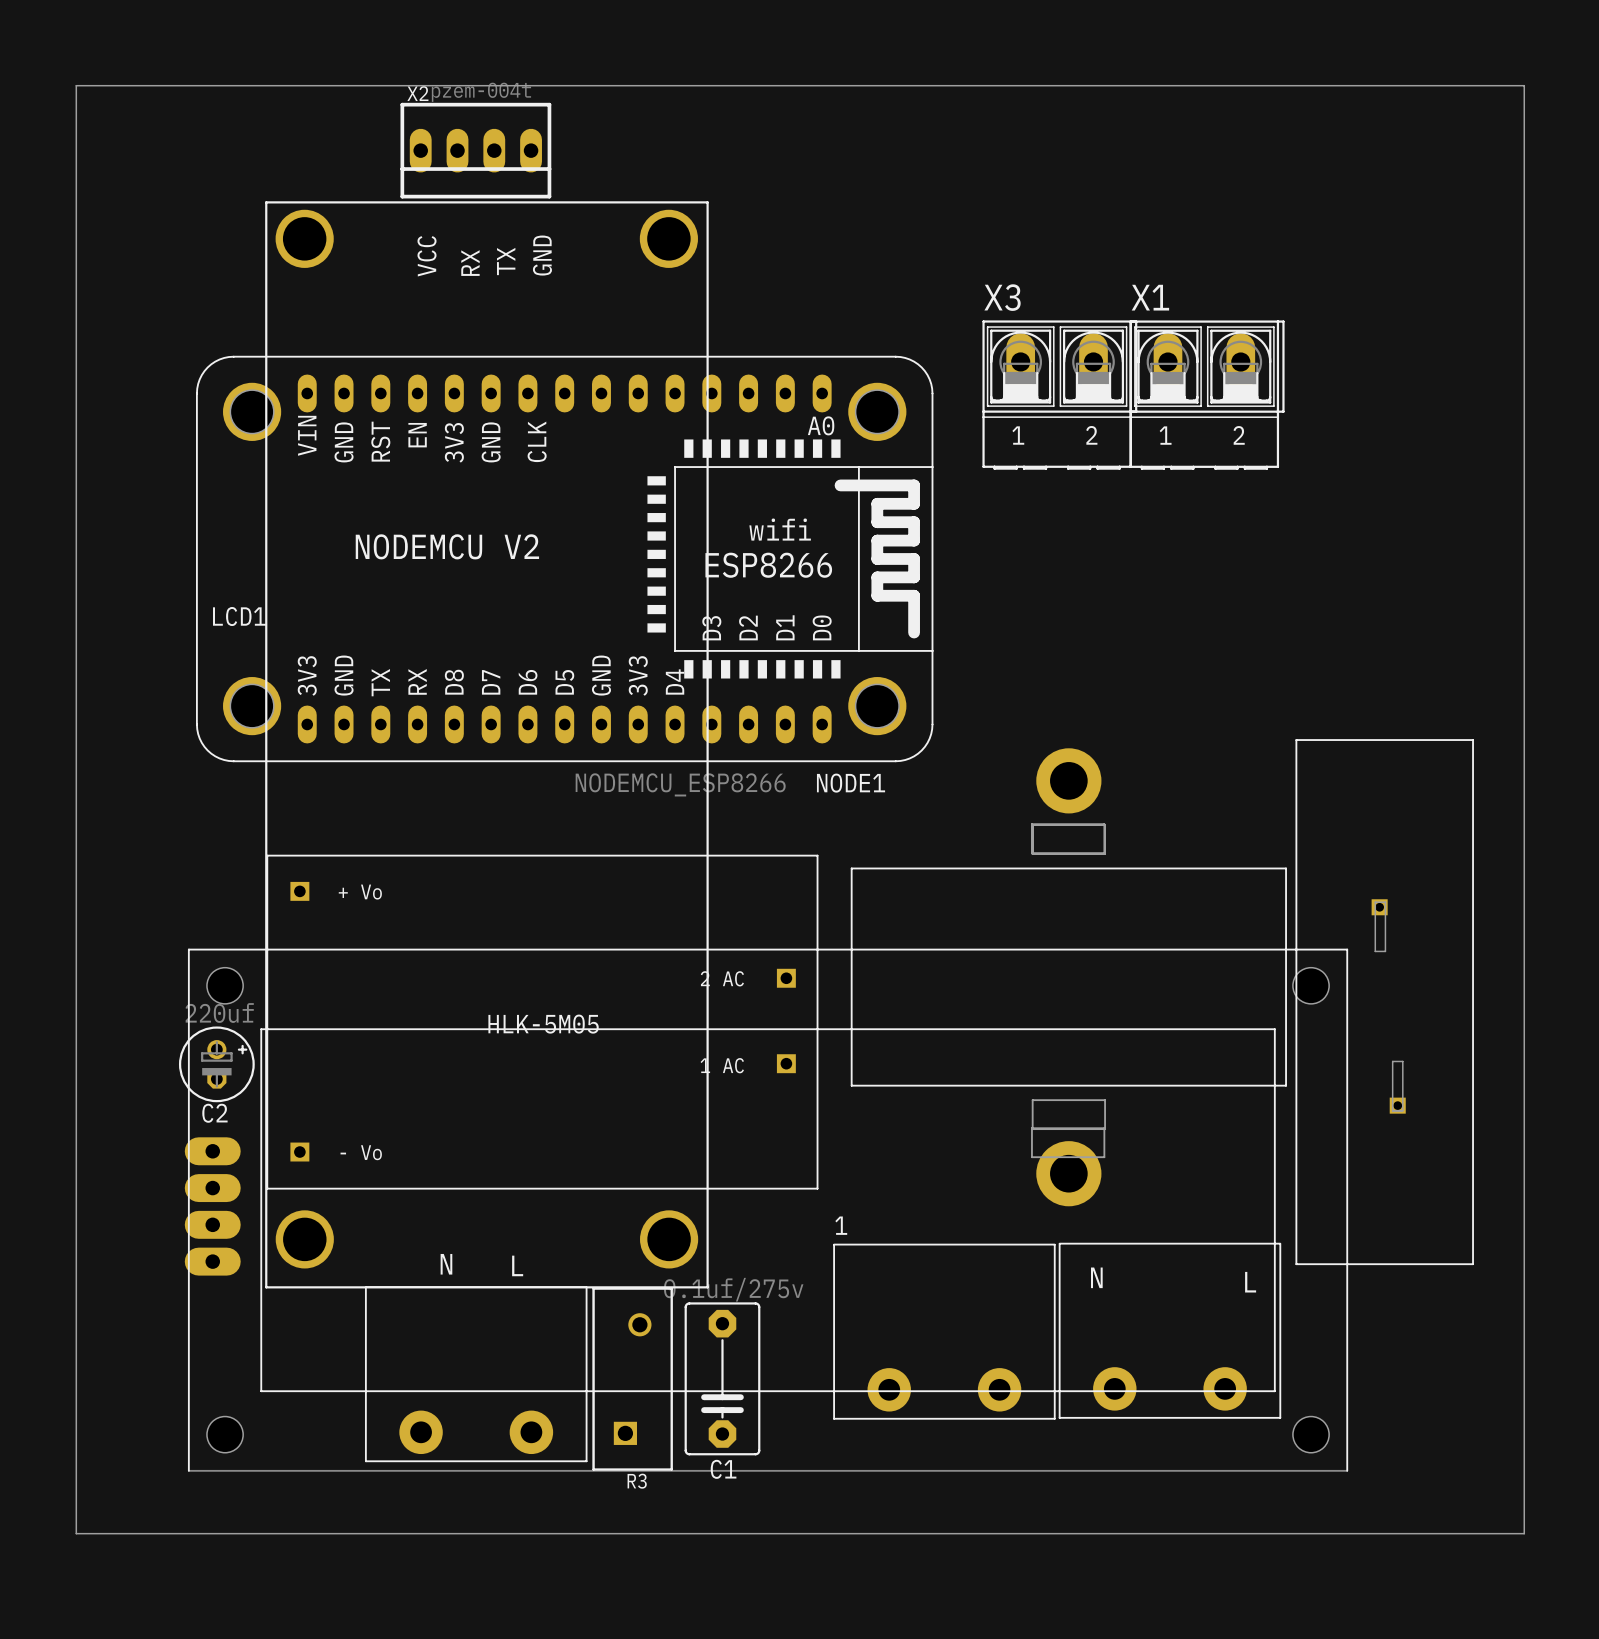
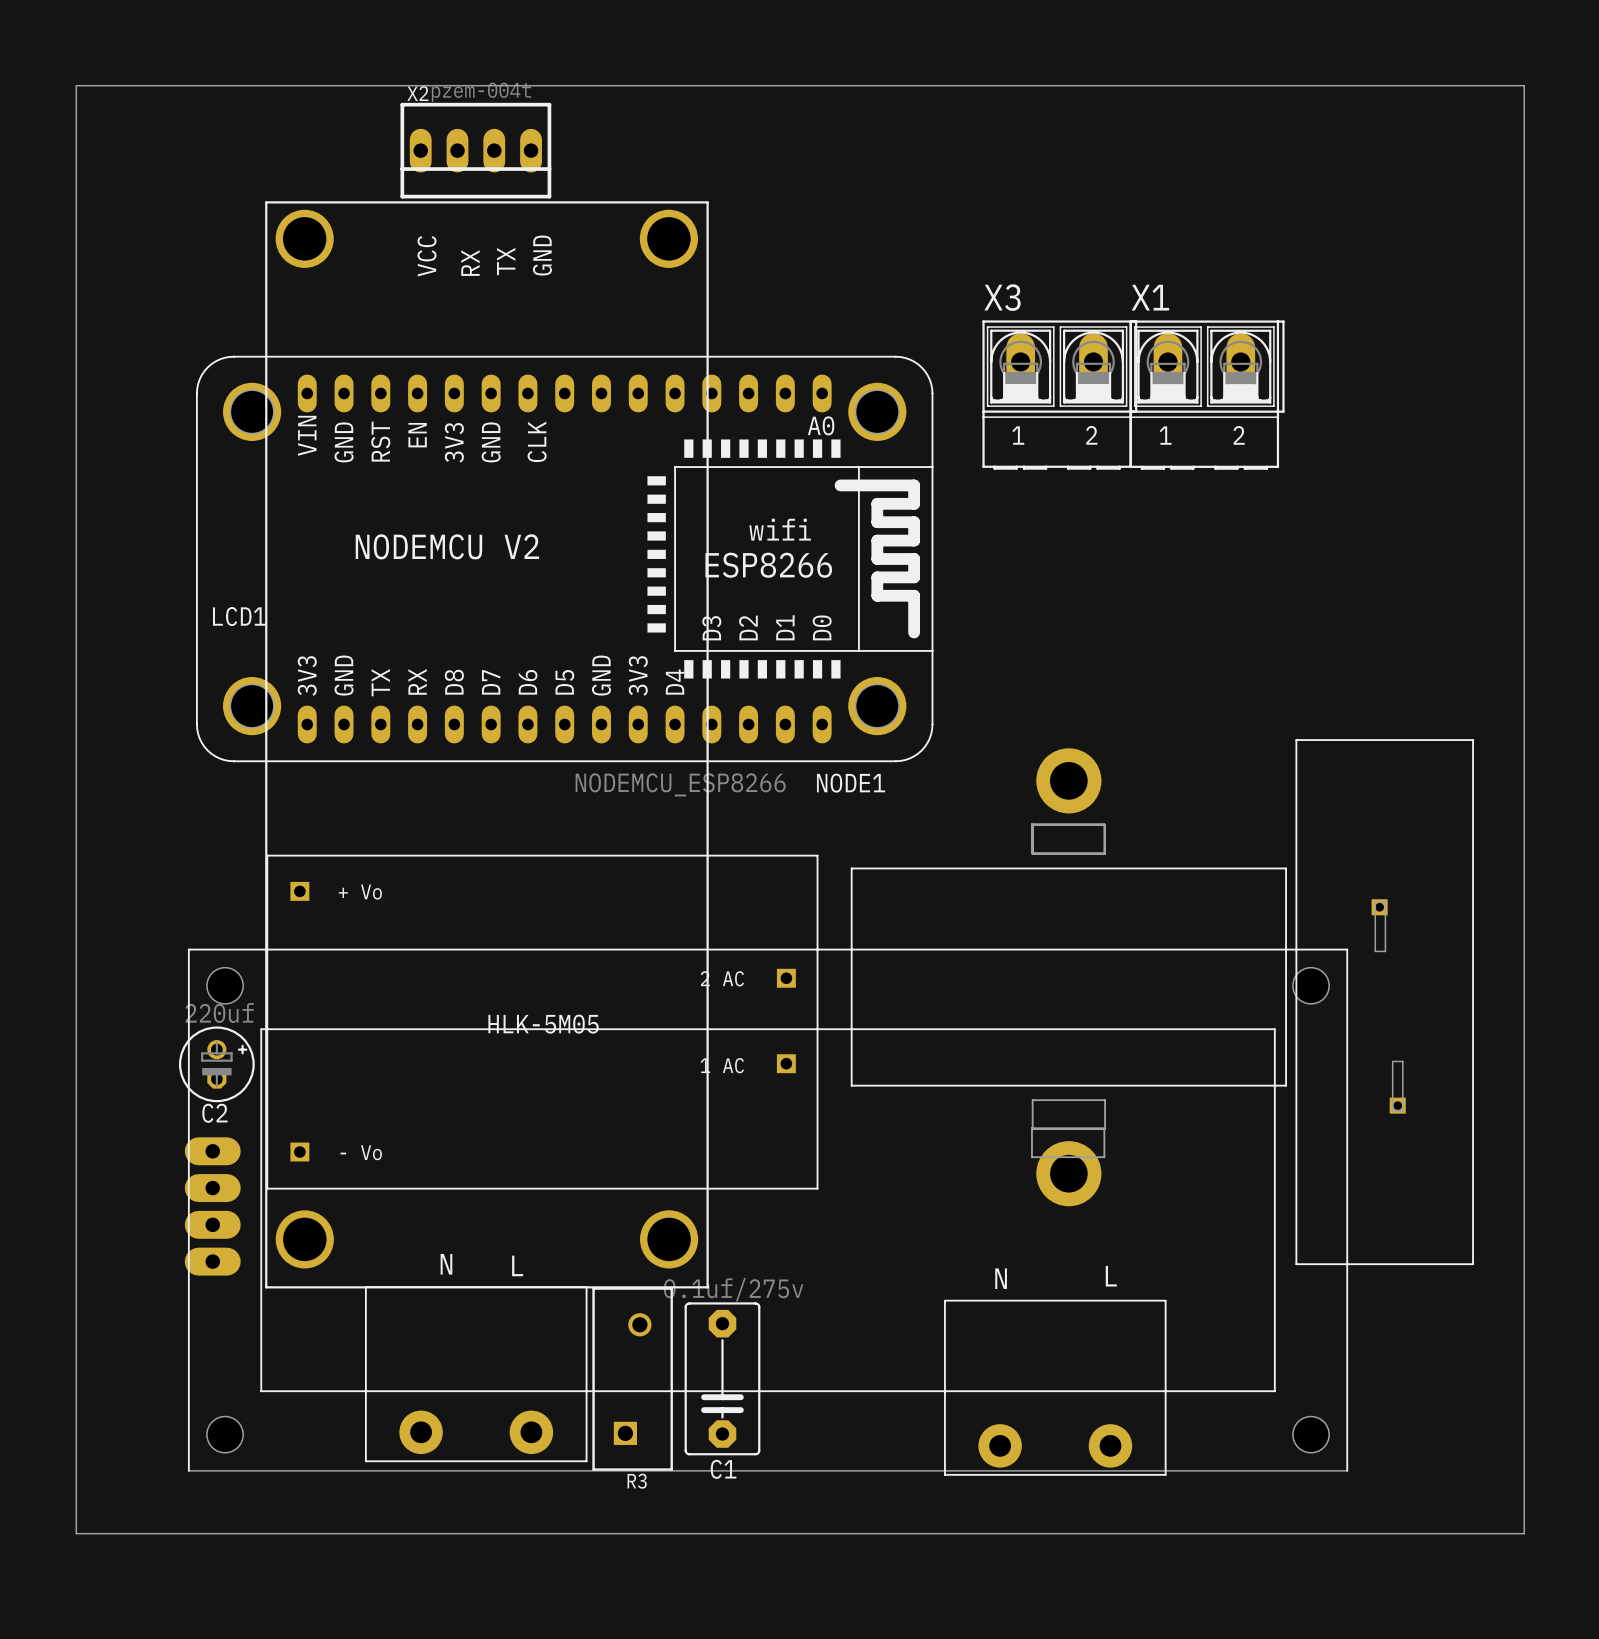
text: N (1096, 1277) -> L (1111, 1276)
text: none -> N (1001, 1278)
text: L (1250, 1282) -> none
part position: (1169, 1330) -> (1055, 1387)
1: (944, 1331) -> none

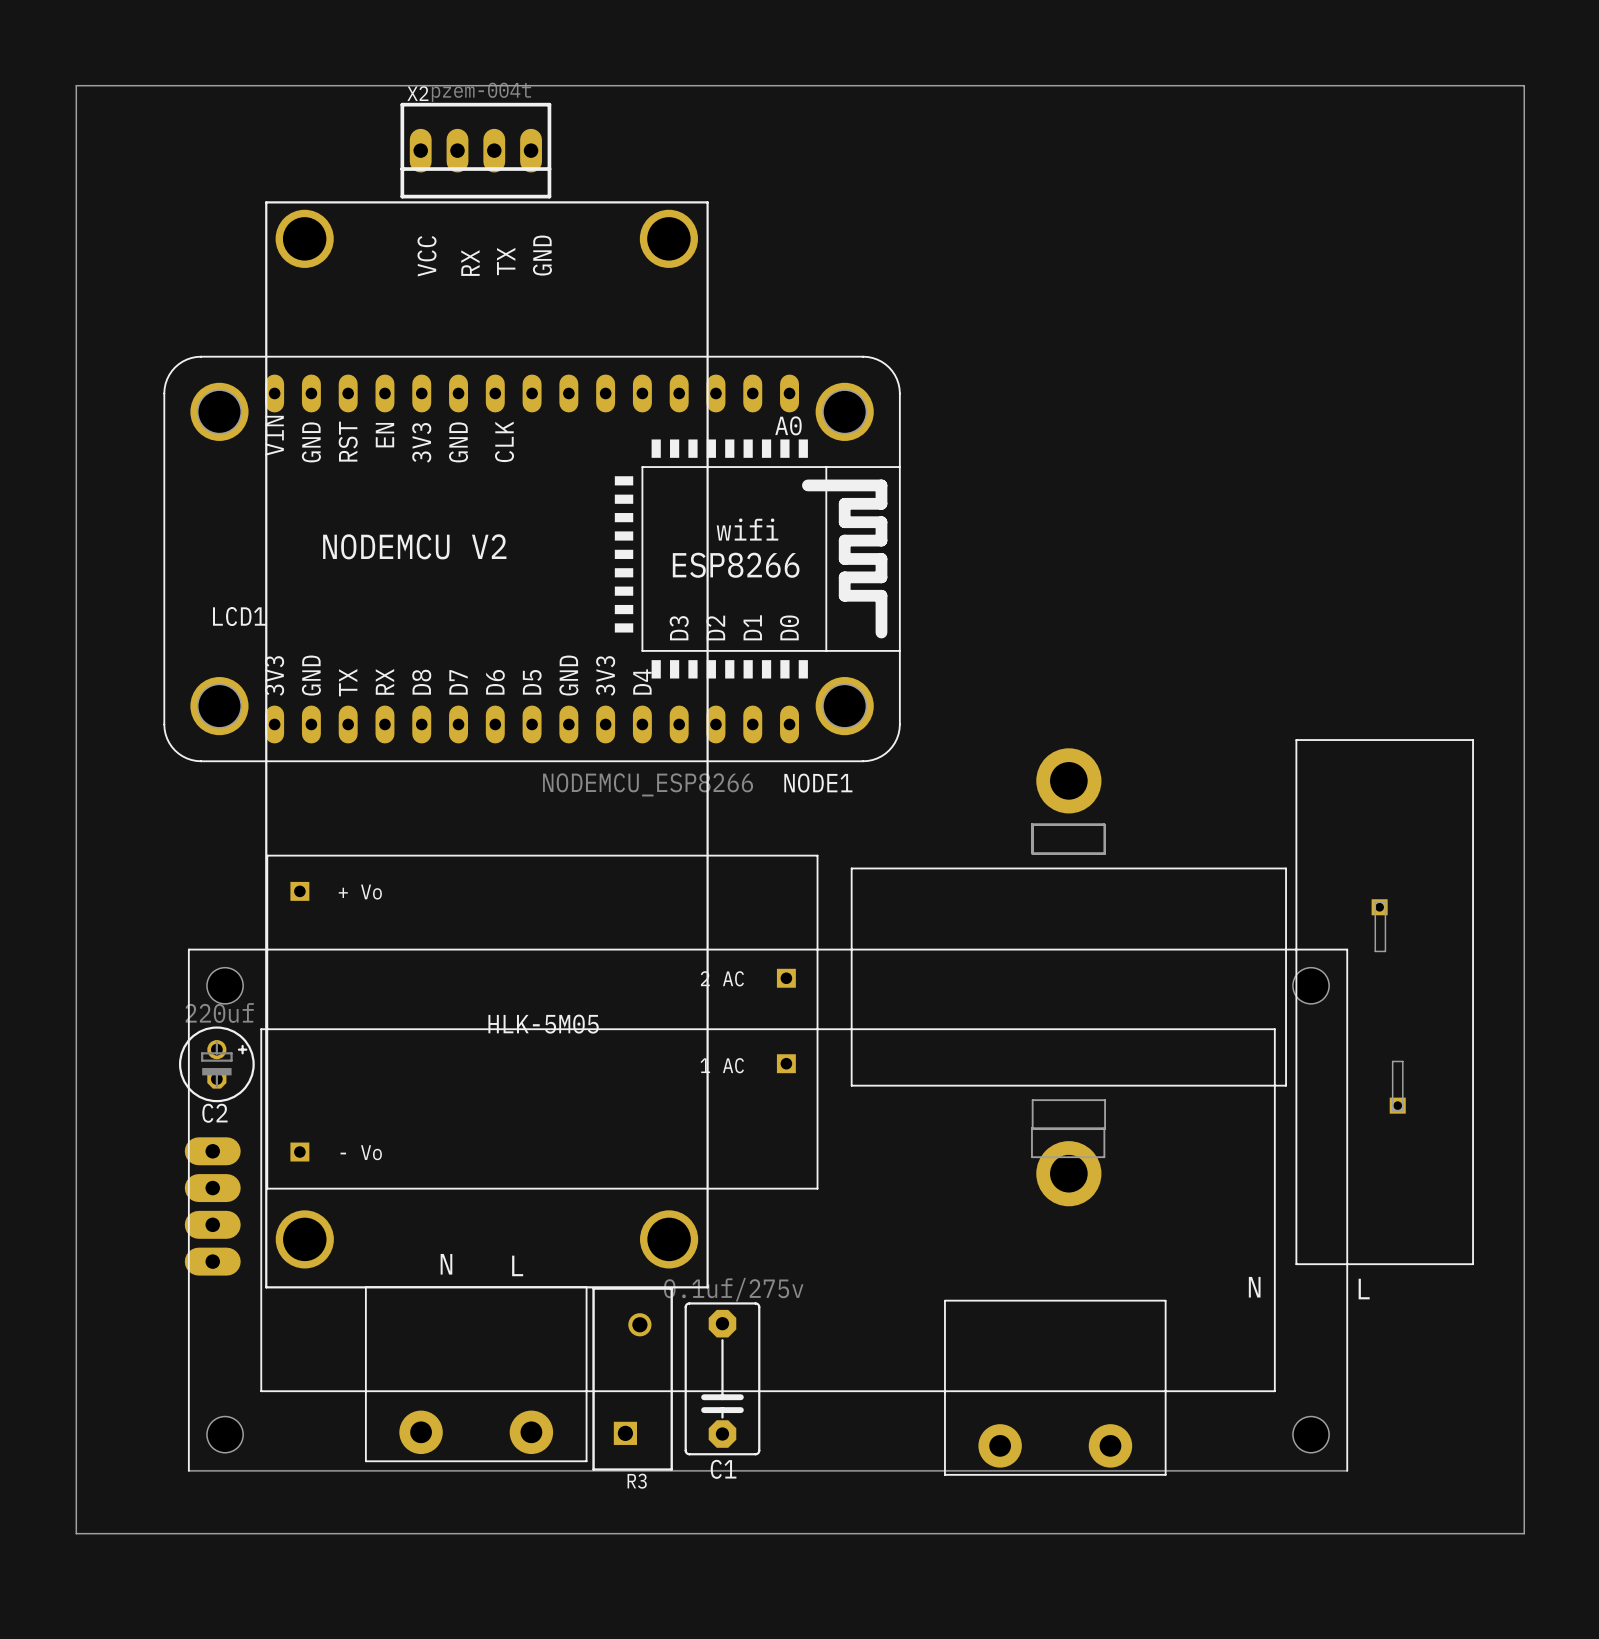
X3: (1059, 395) -> none
X1: (1207, 395) -> none
NODE1 position: (564, 558) -> (532, 558)
text position: L (1111, 1276) -> L (1364, 1289)
text position: N (1001, 1278) -> N (1254, 1287)

